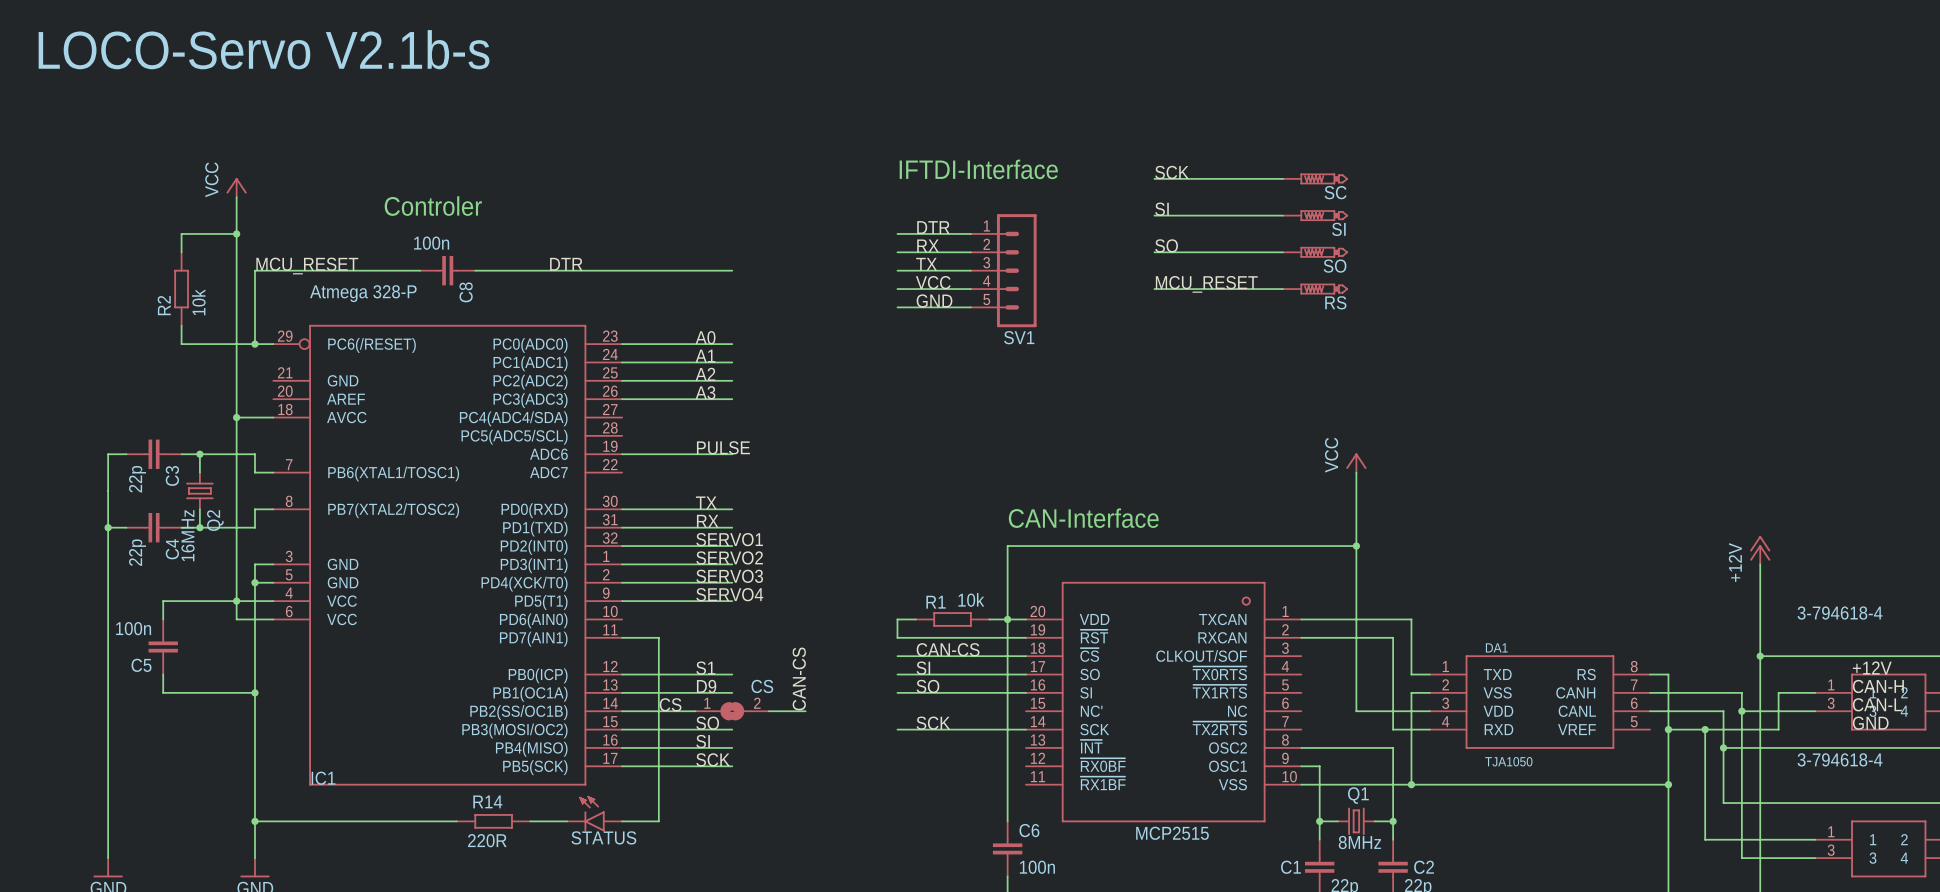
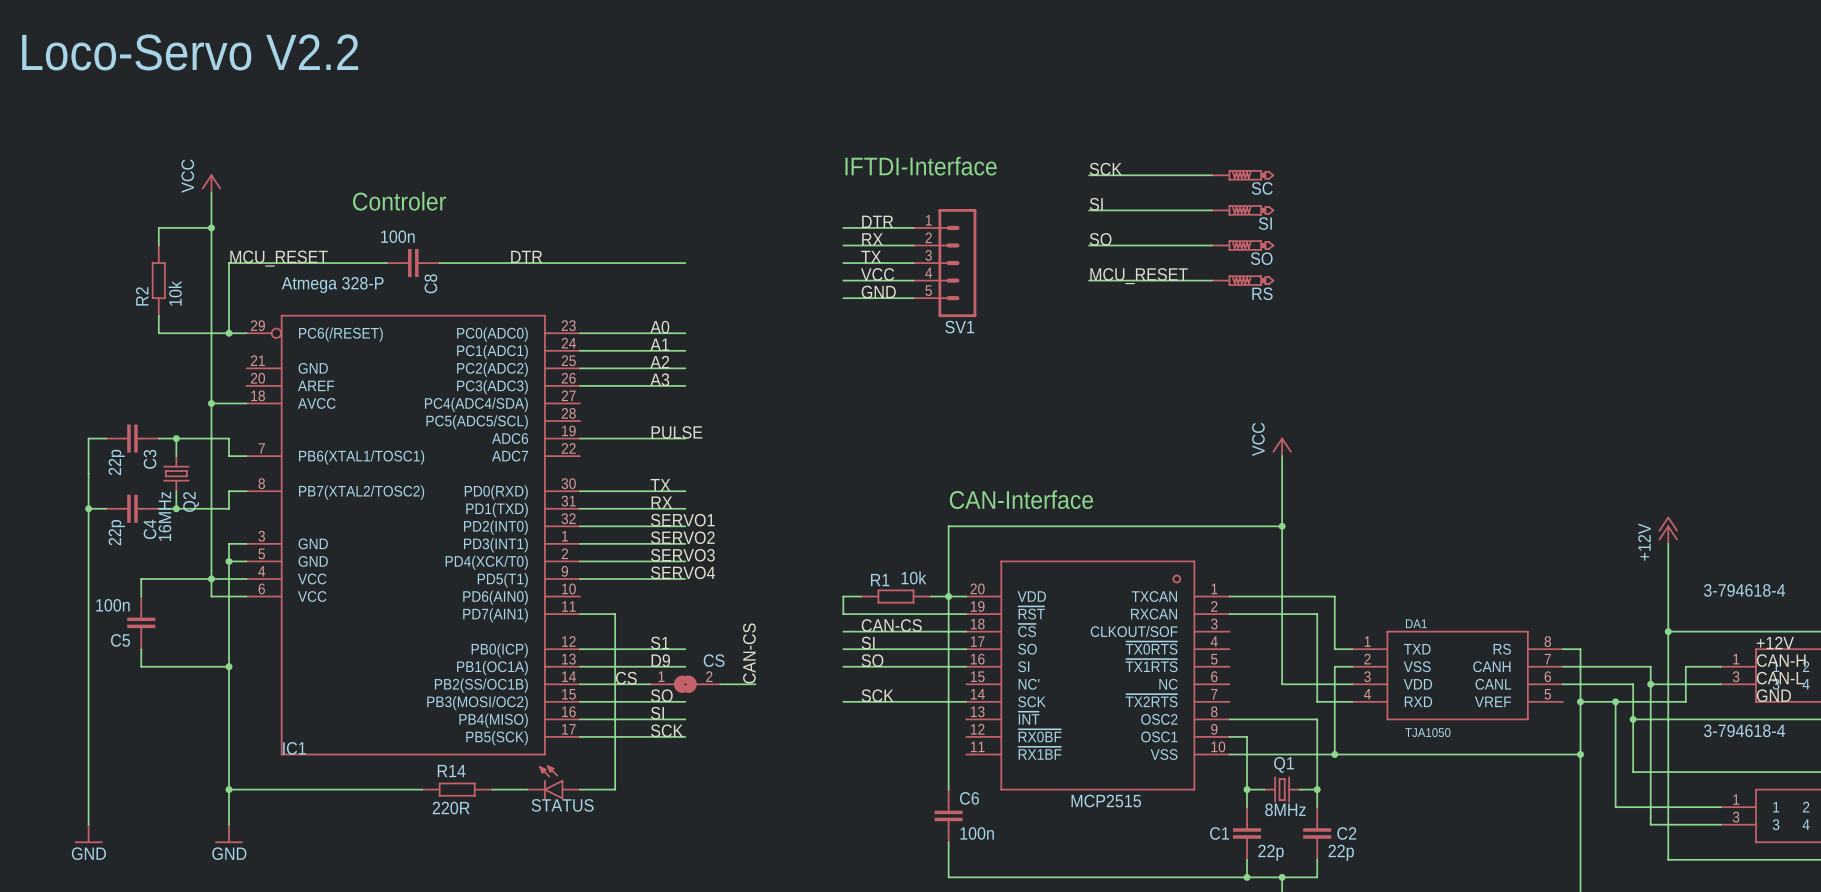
text: LOCO-Servo V2.1b-s (264, 49) -> Loco-Servo V2.2 (190, 52)

